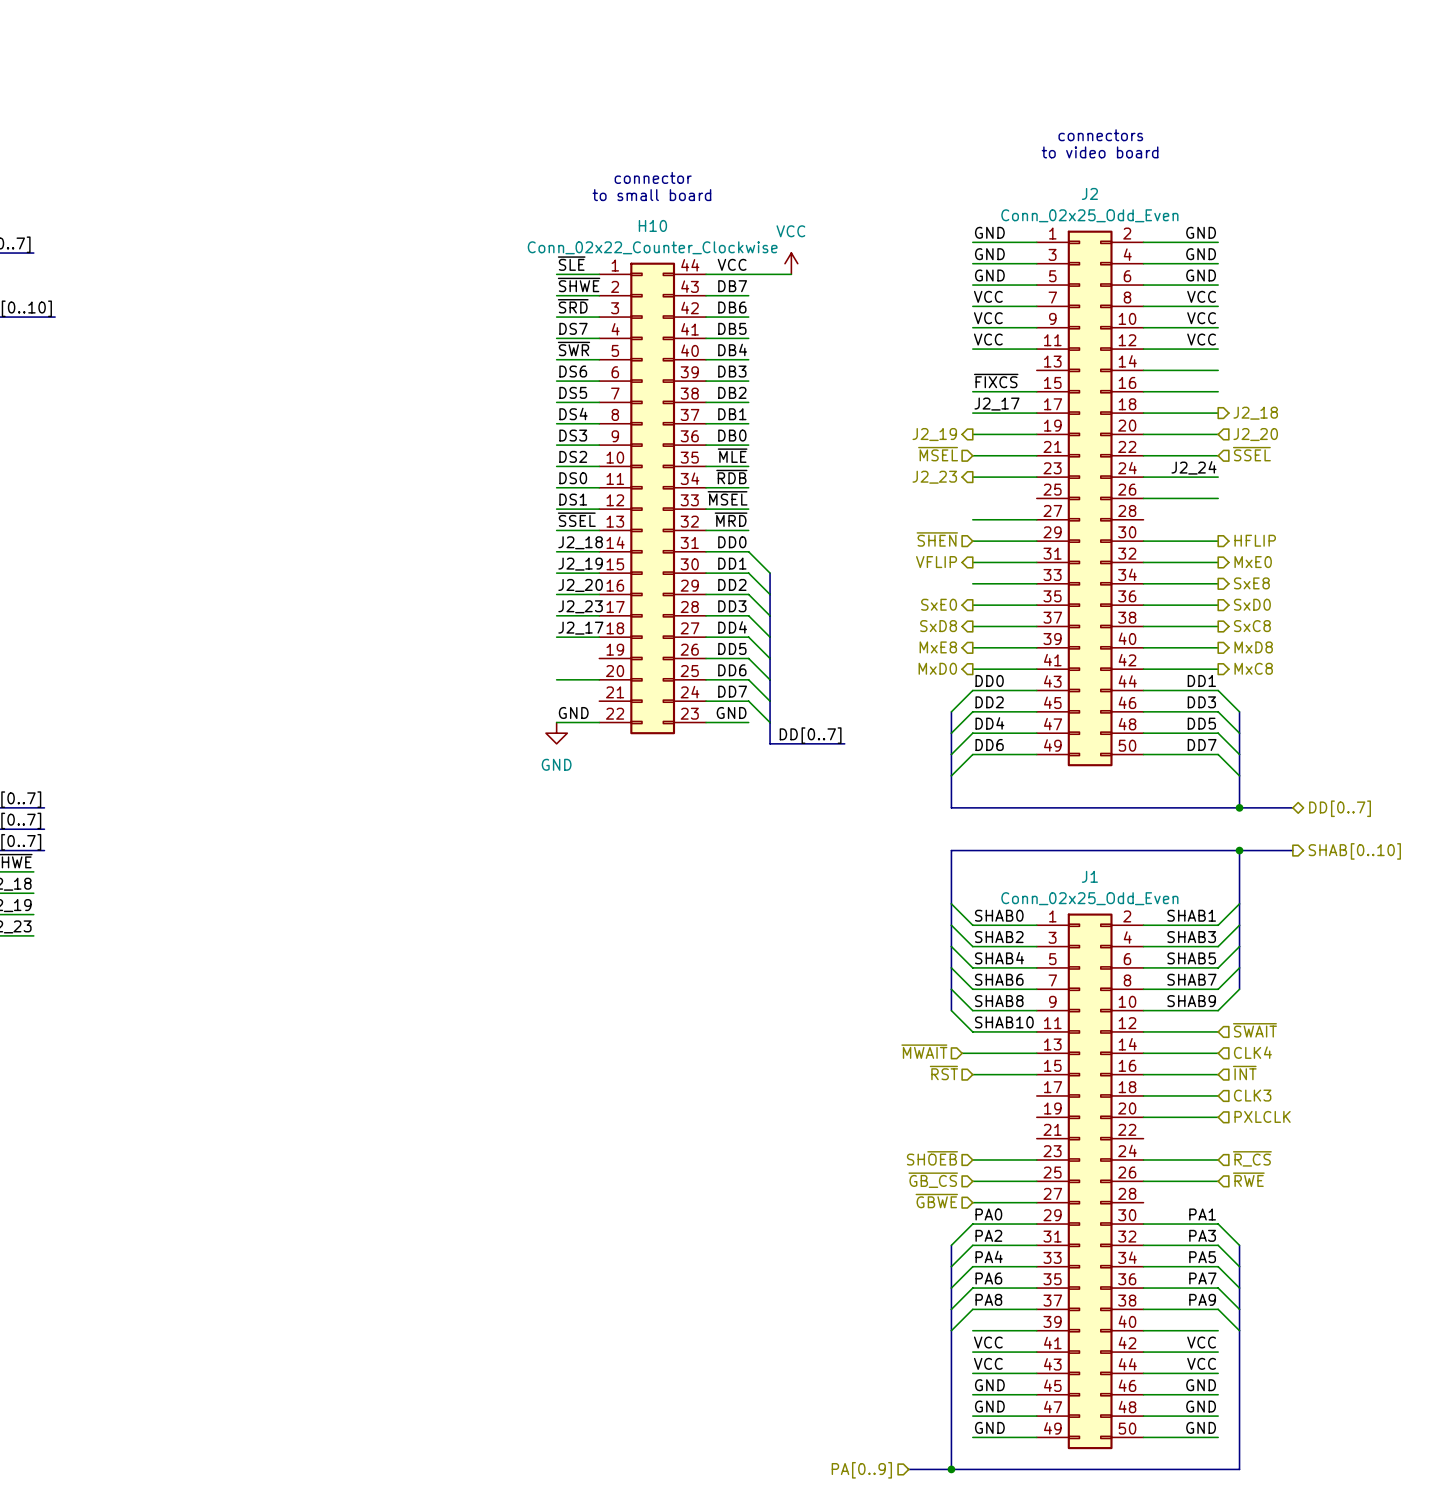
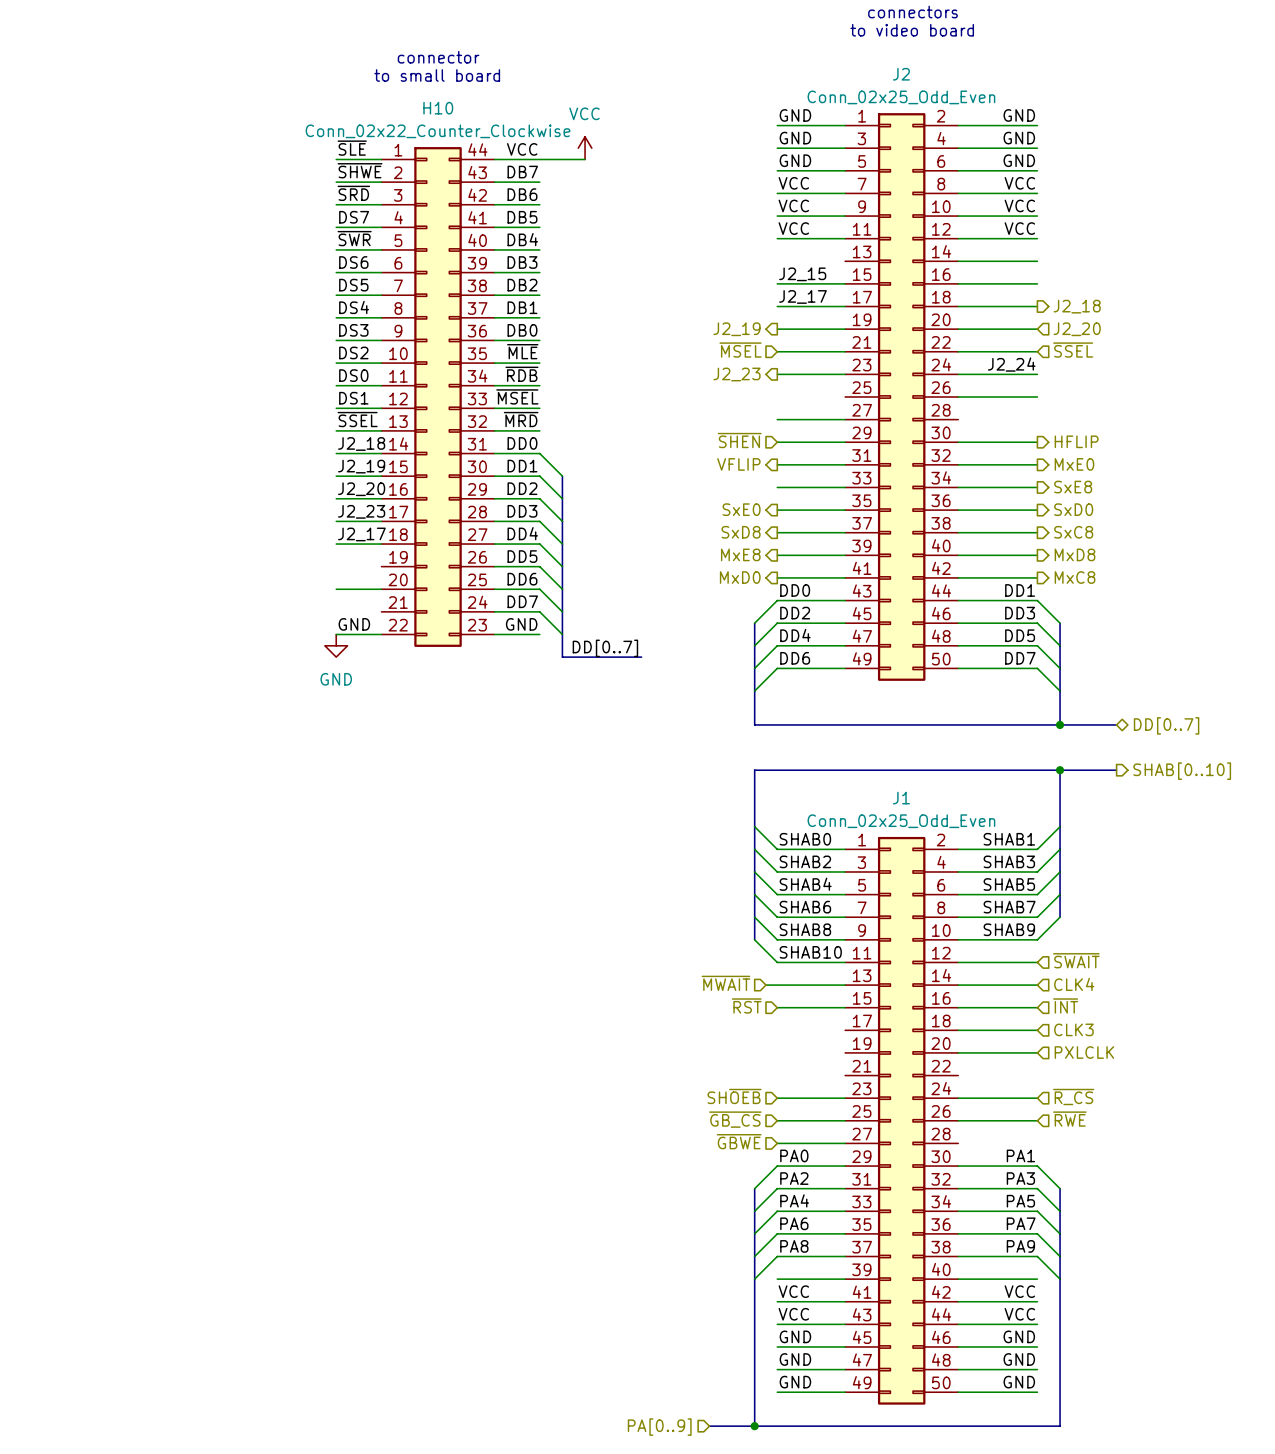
label: ~{FIXCS} (996, 380) -> J2_15 (802, 274)

